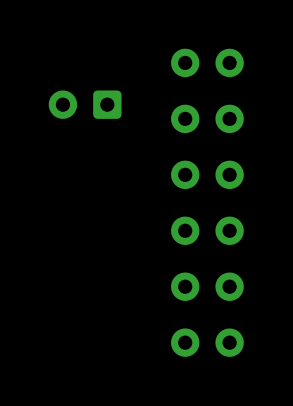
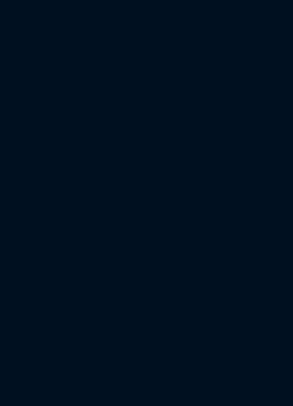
part: (207, 62) -> none
part: (85, 104) -> none
part: (207, 118) -> none
part: (207, 174) -> none
part: (207, 230) -> none
part: (207, 286) -> none
part: (207, 342) -> none

